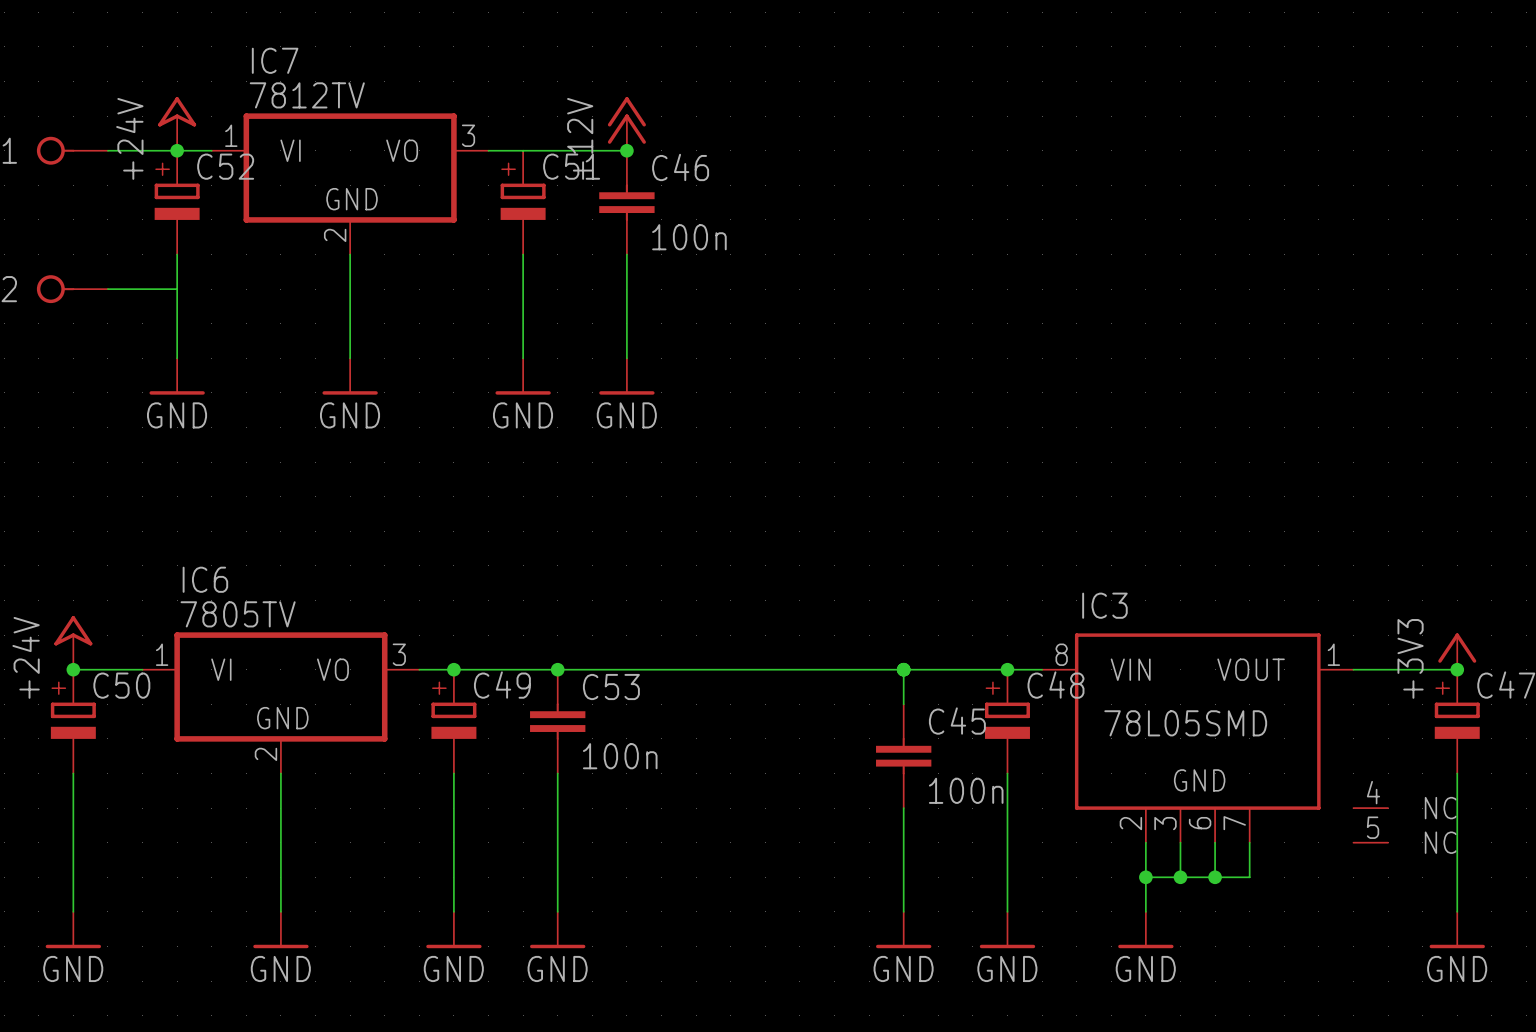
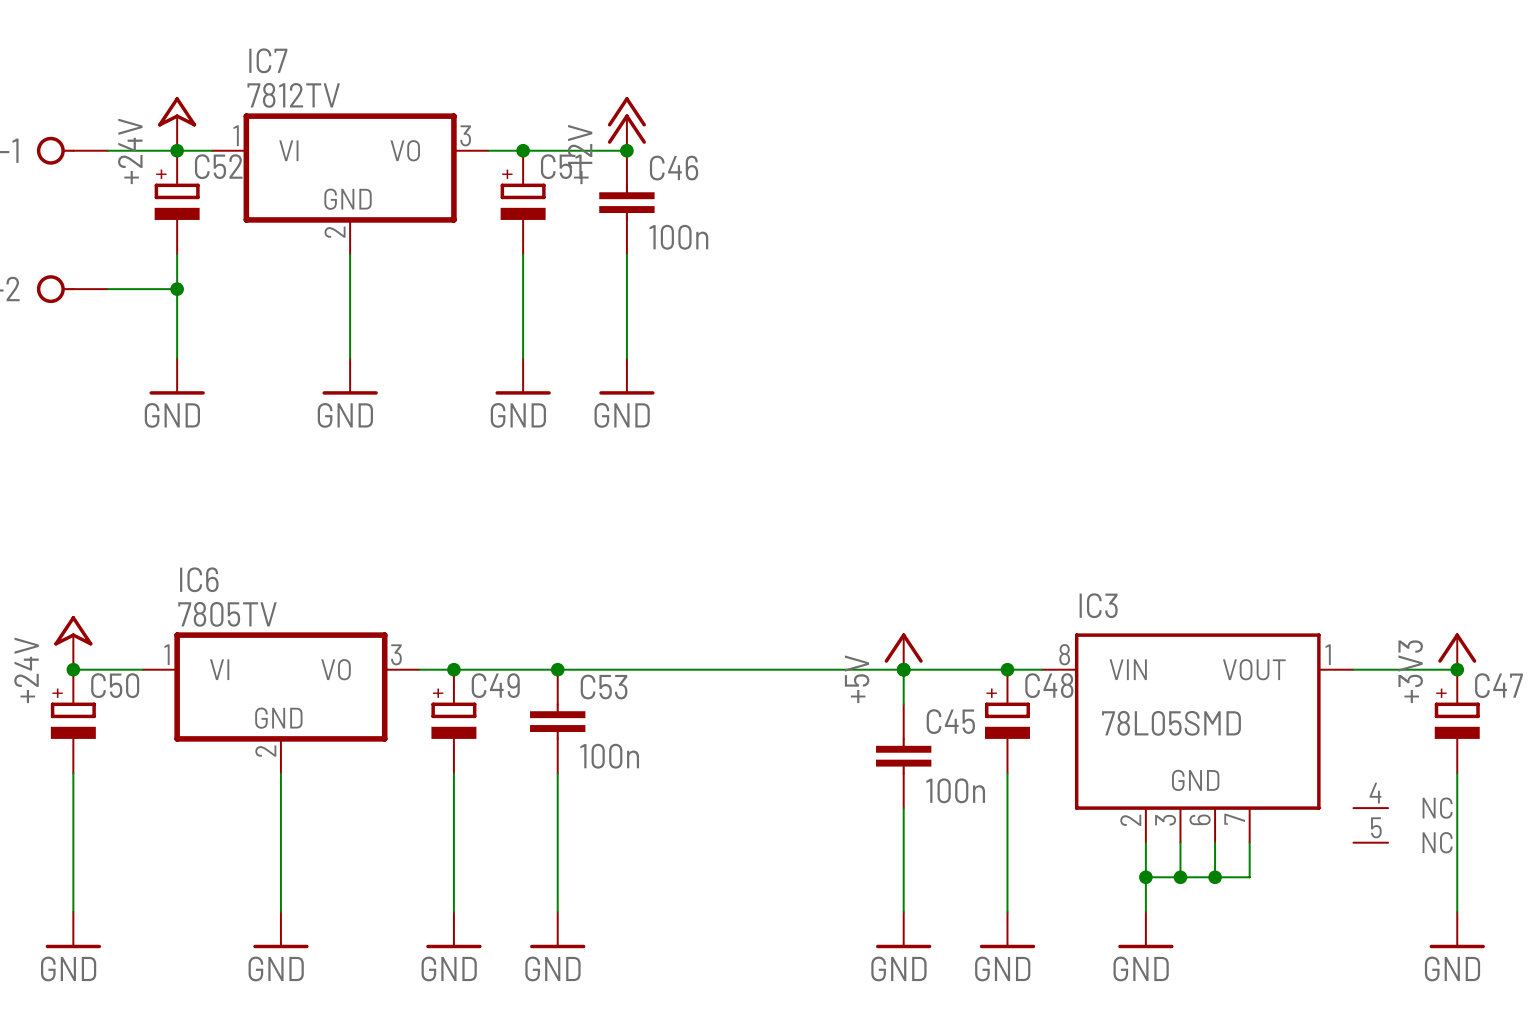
junction: none -> (523, 150)
junction: none -> (177, 289)
power symbol: none -> +5V (903, 651)

